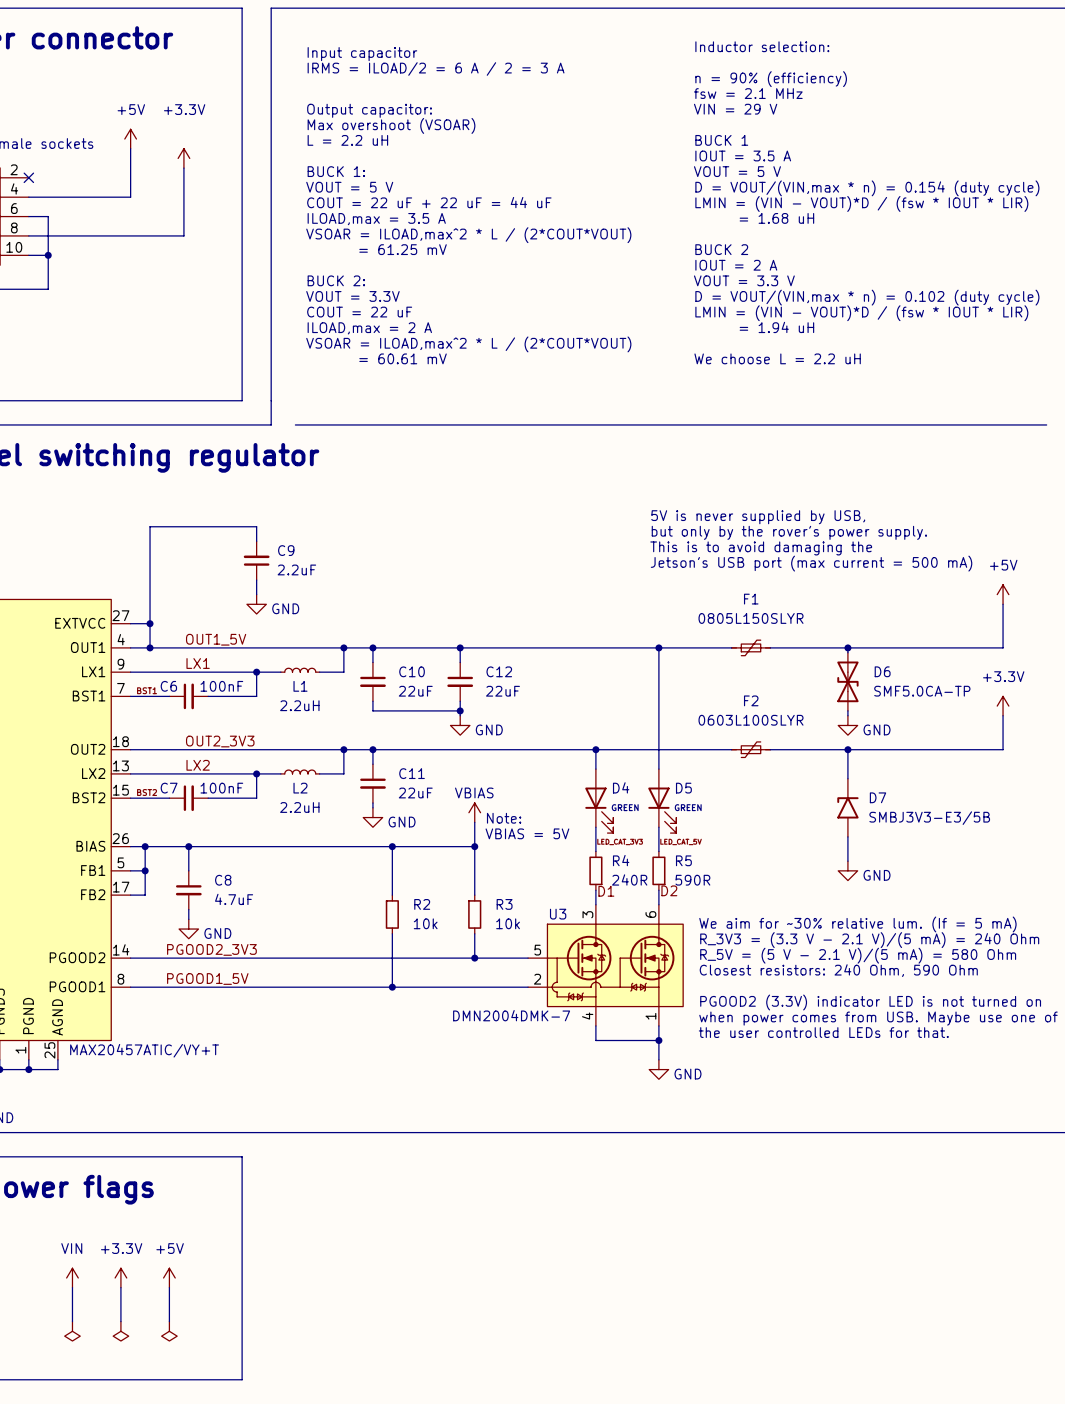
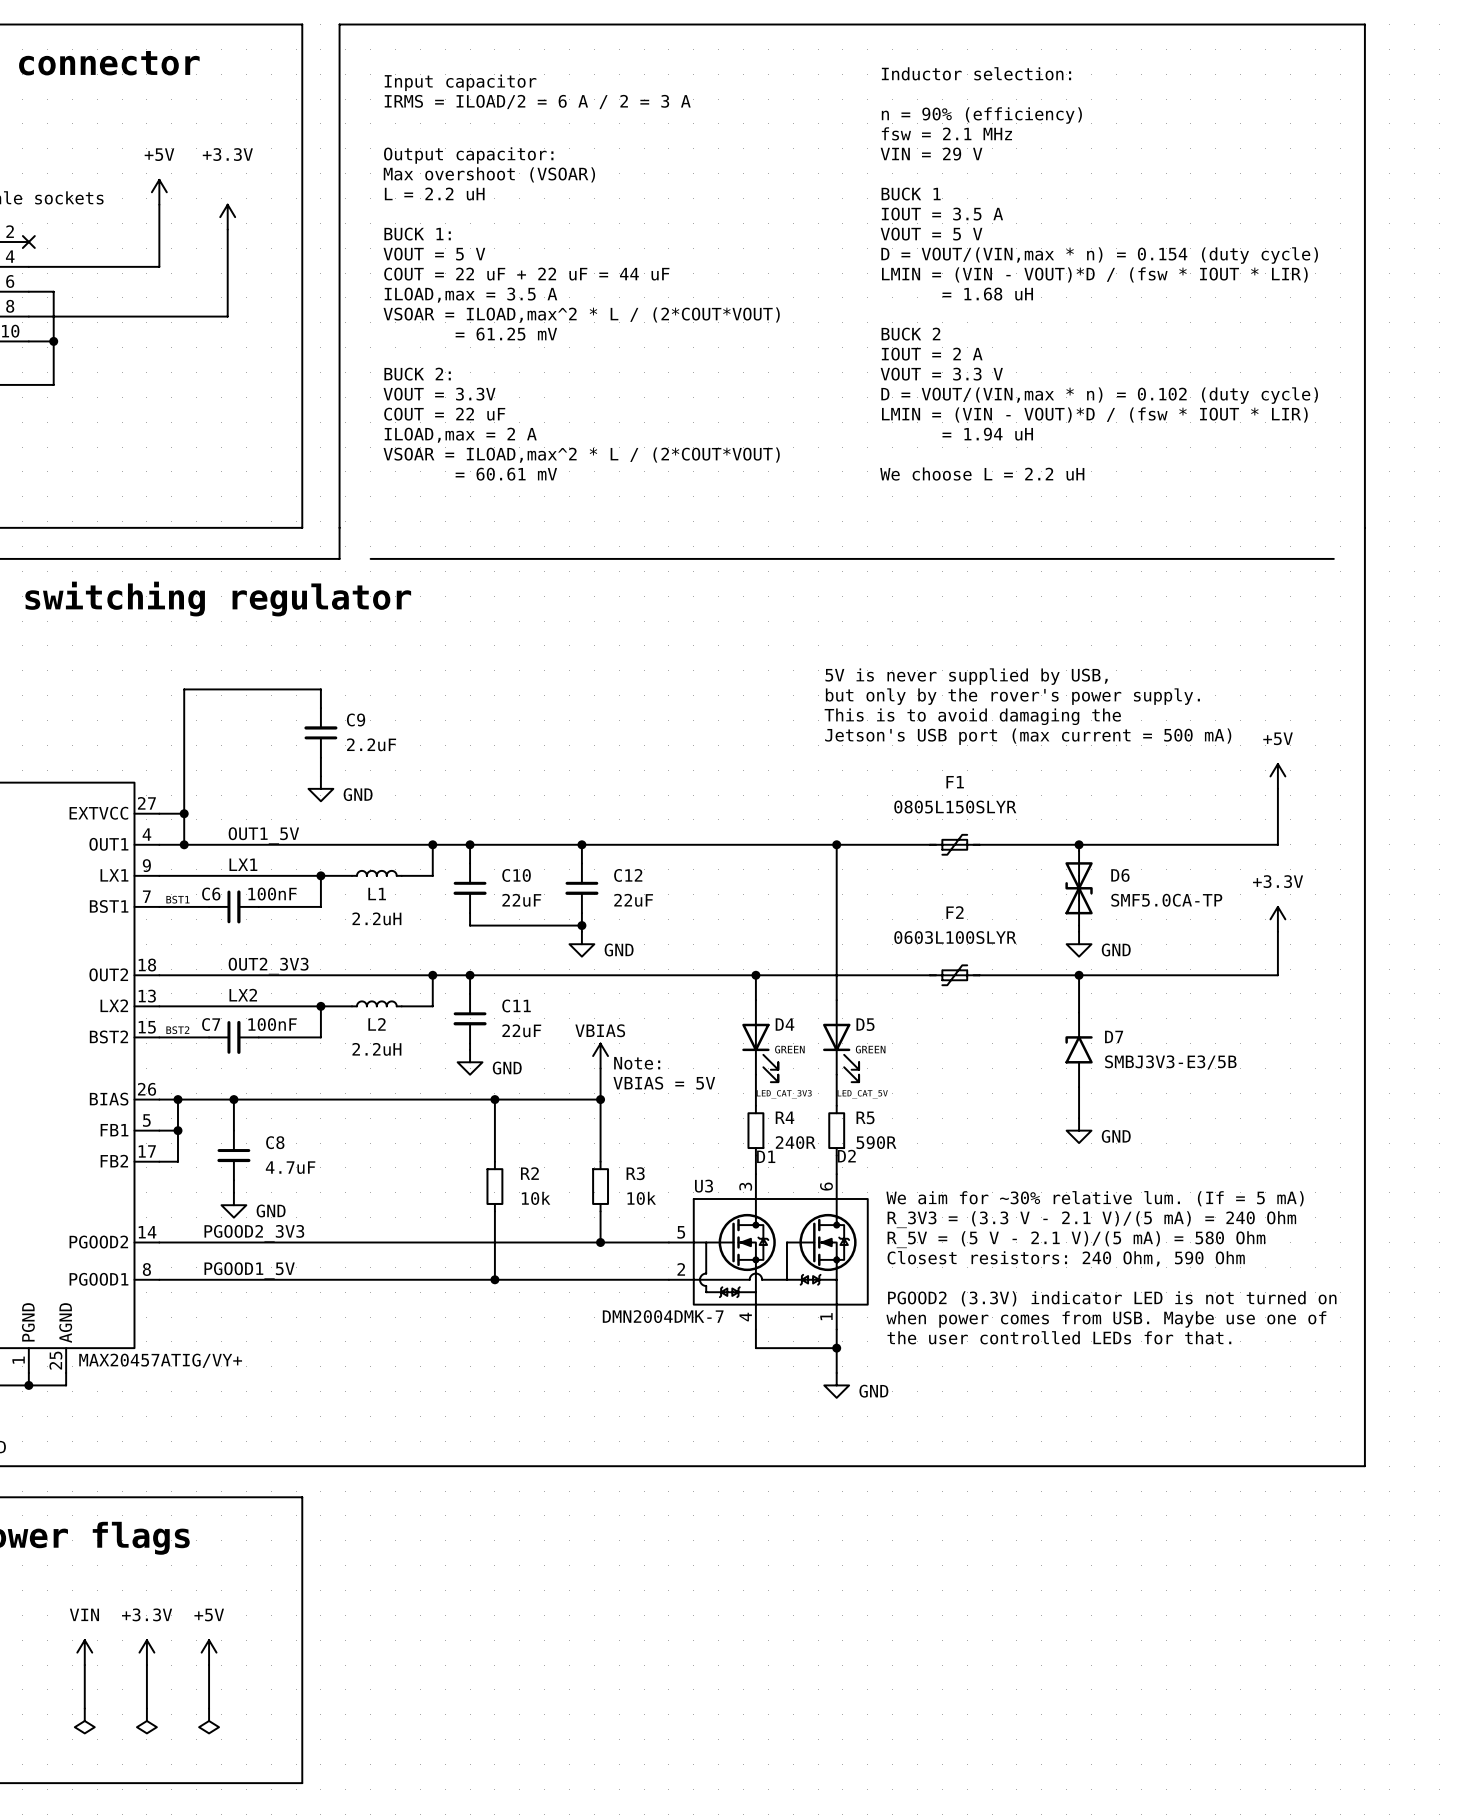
part value: MAX20457ATIC/VY+T (144, 1050) -> MAX20457ATIG/VY+ (160, 1360)

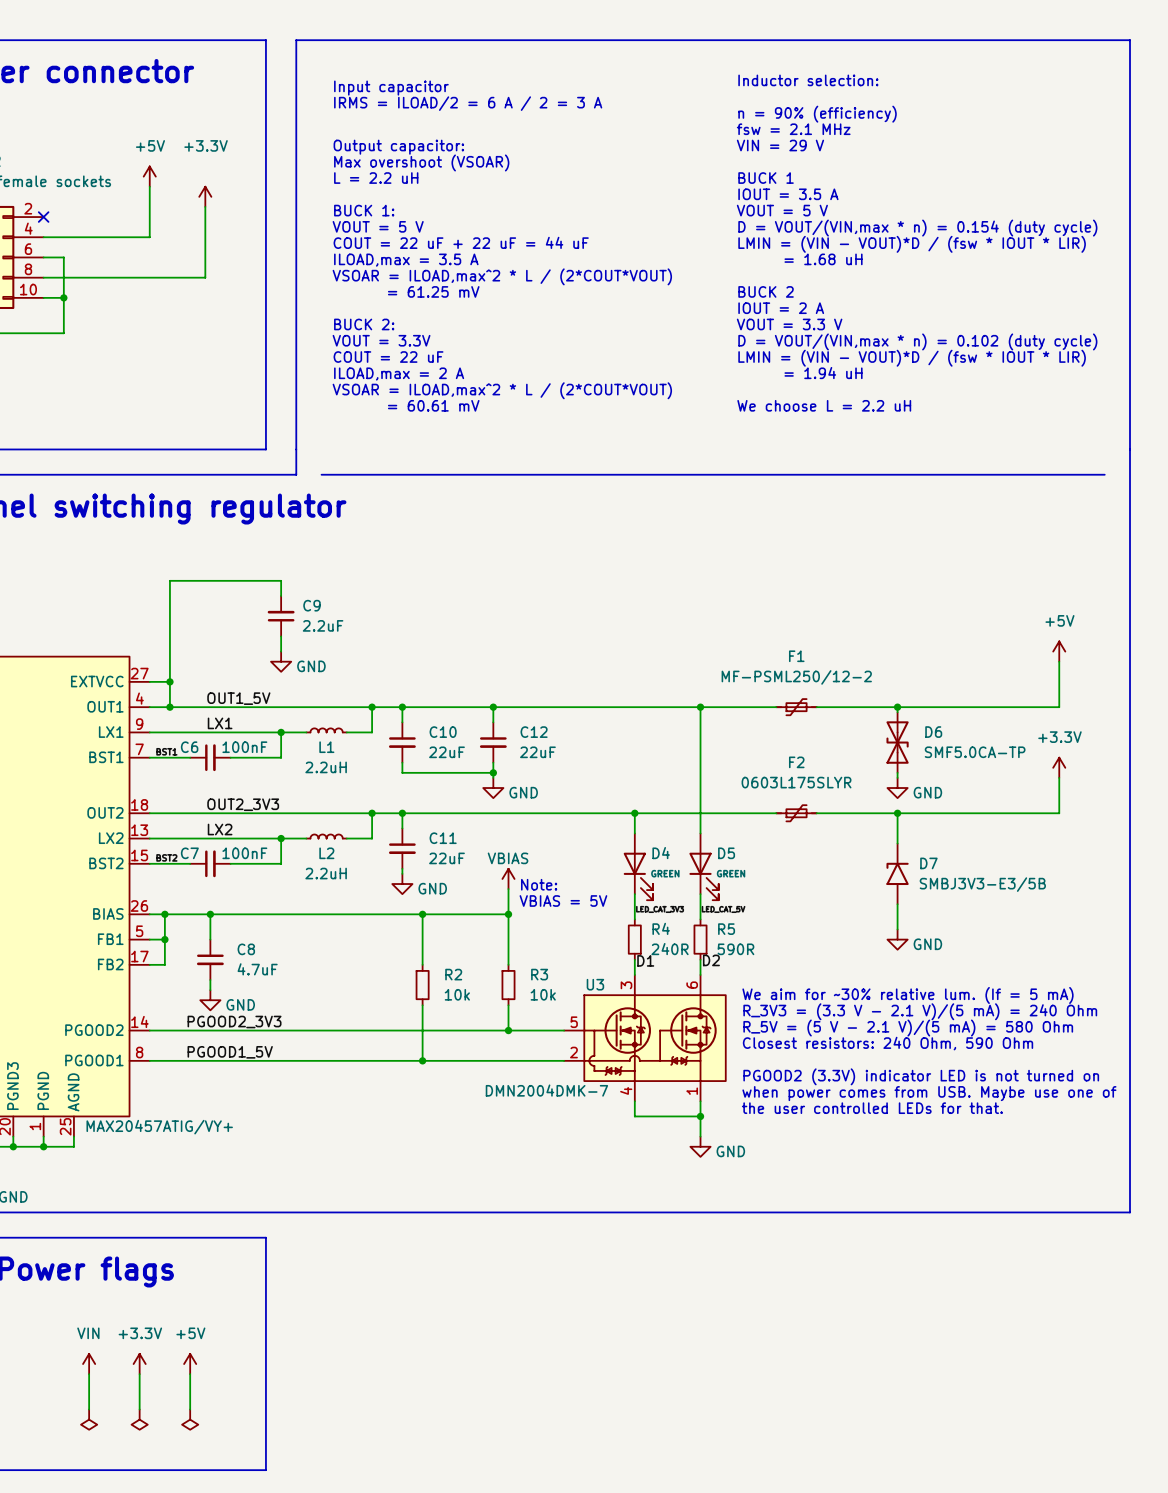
text: 5V is never supplied by USB, (966, 676) -> none
text: but only by the rover's power supply. (1012, 696) -> none
text: This is to avoid damaging the (972, 716) -> none
text: Jetson's USB port (max current = 500 mA) (1028, 736) -> none
F1 value: 0805L150SLYR (955, 807) -> MF-PSML250/12-2 (796, 677)
F2 value: 0603L100SLYR (955, 937) -> 0603L175SLYR (796, 782)

